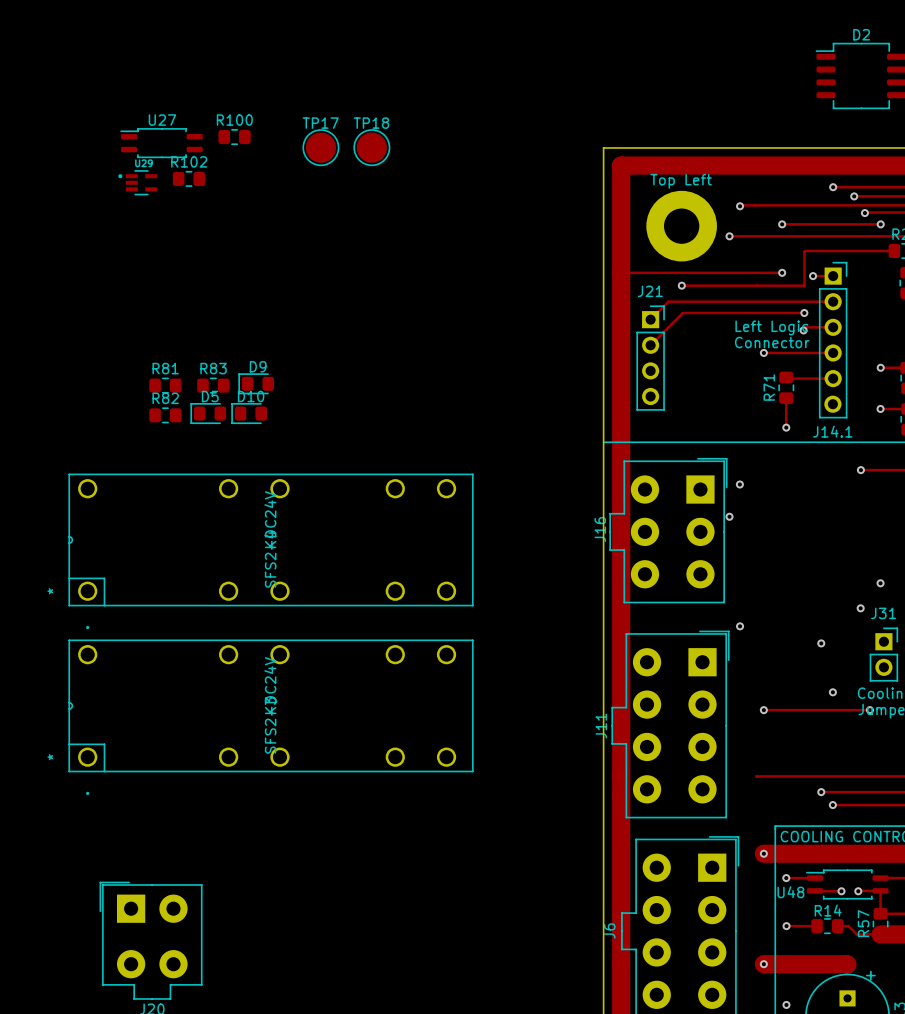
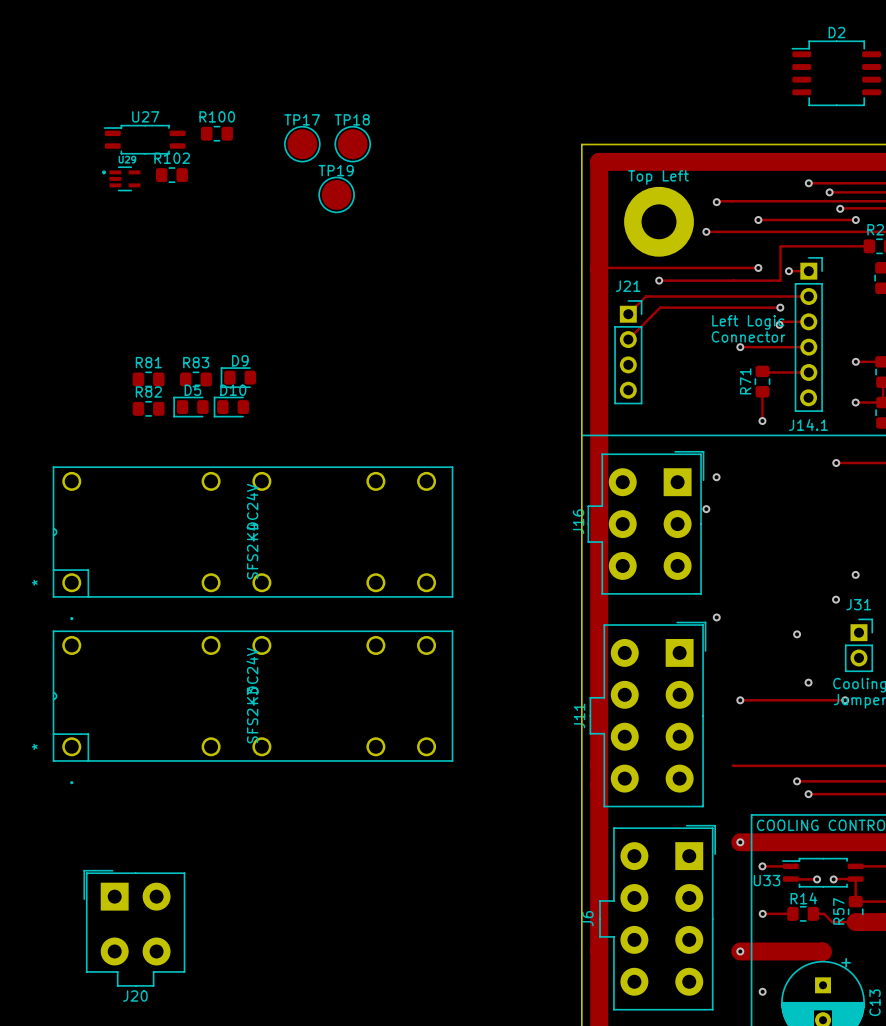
TP19: none -> (336, 194)
U48 name: U48 (790, 892) -> U33 (767, 880)

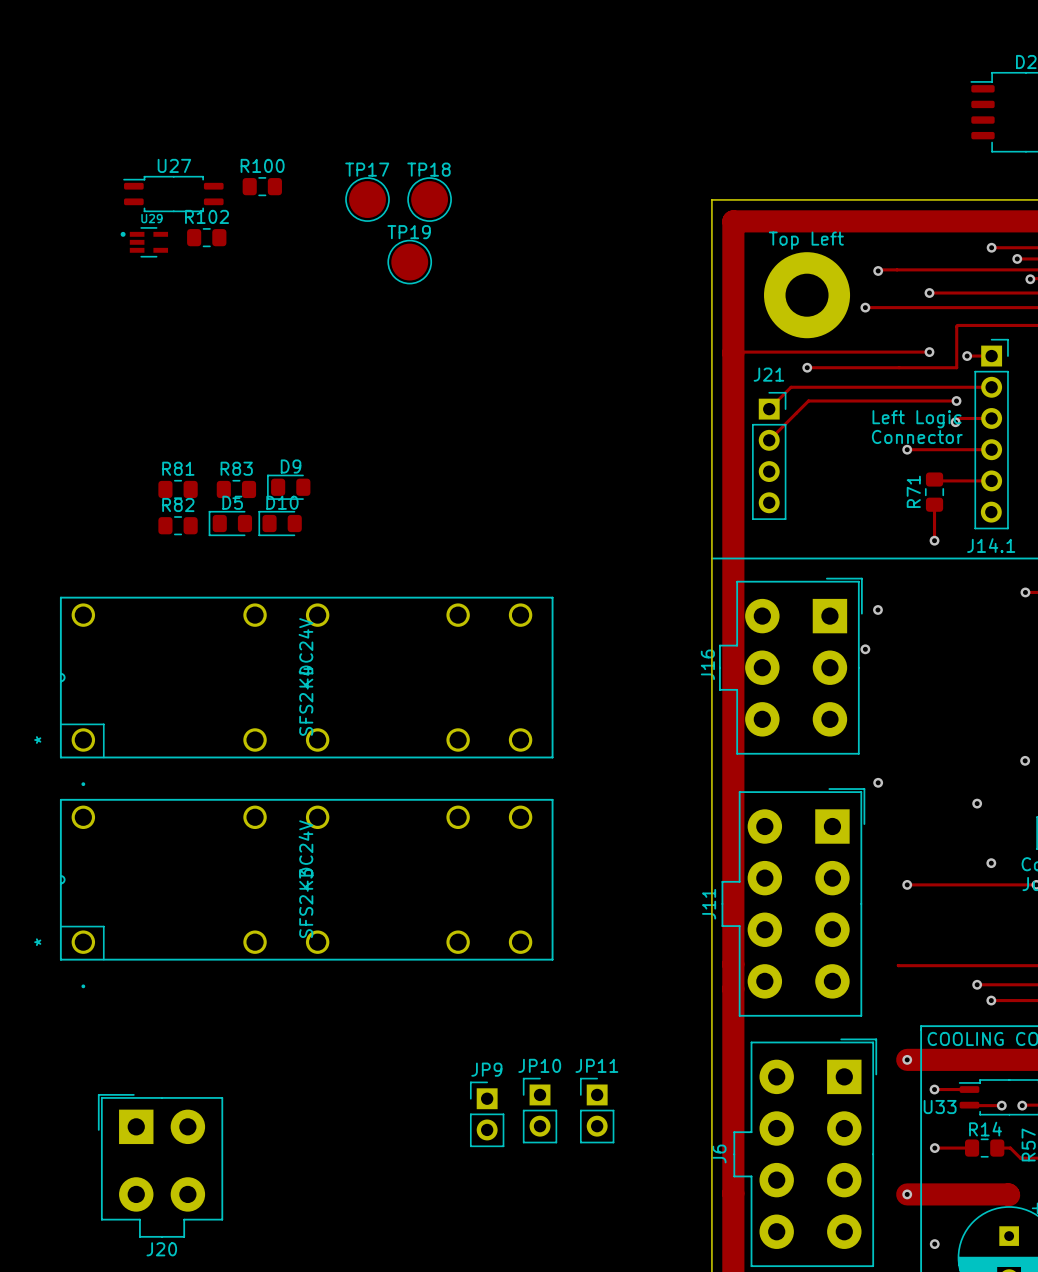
JP10: none -> (540, 1110)
JP11: none -> (597, 1110)
JP9: none -> (487, 1114)

